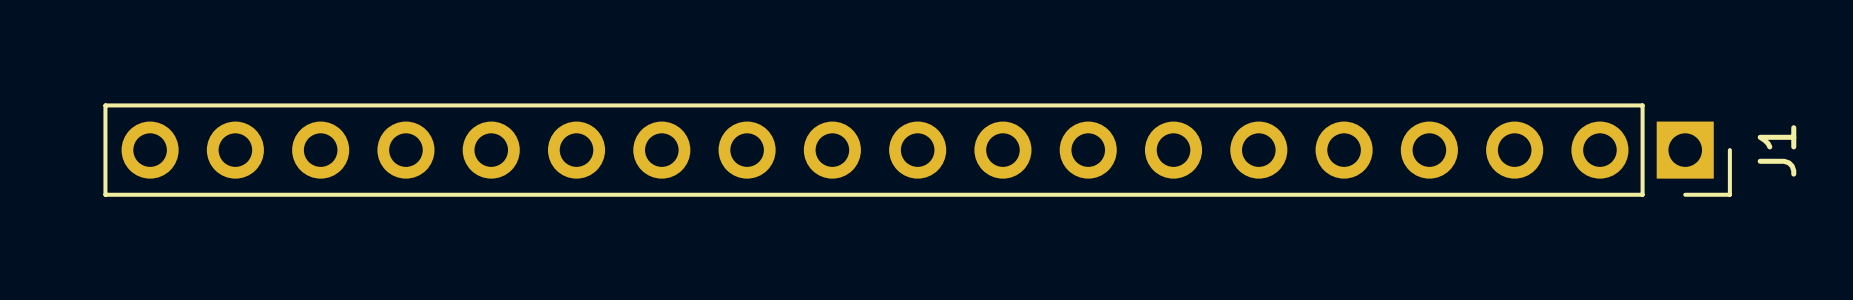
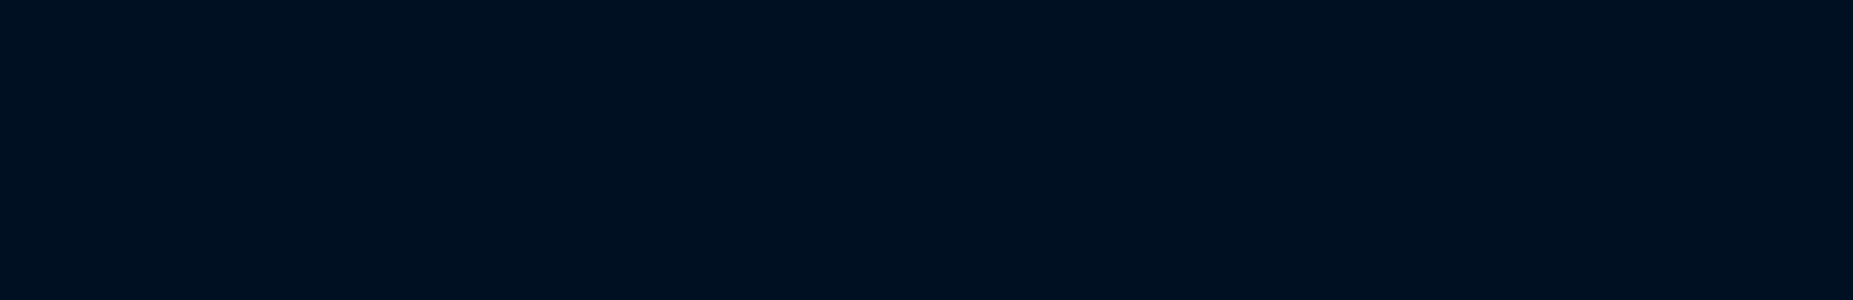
J1: (917, 150) -> none

